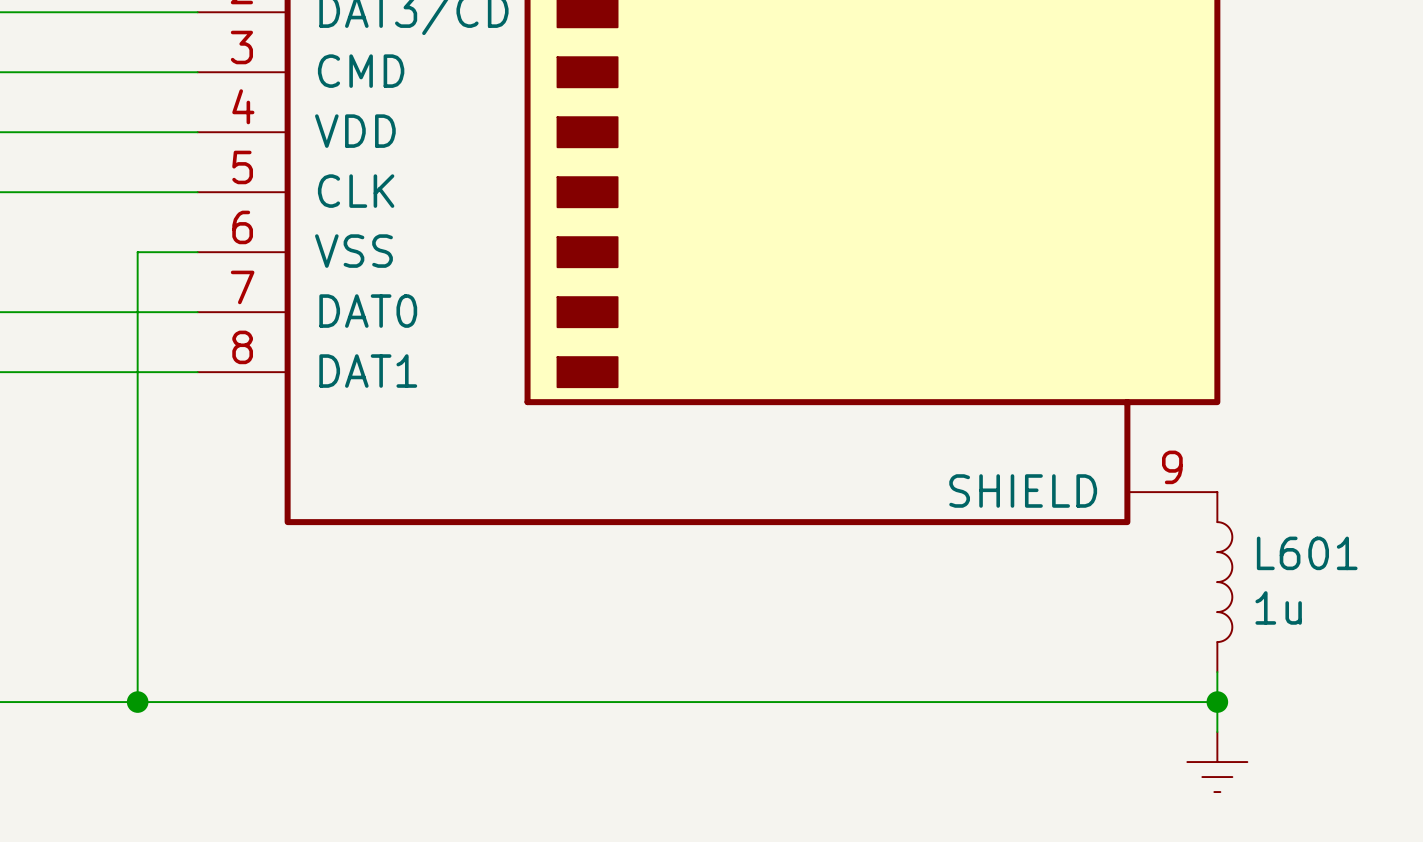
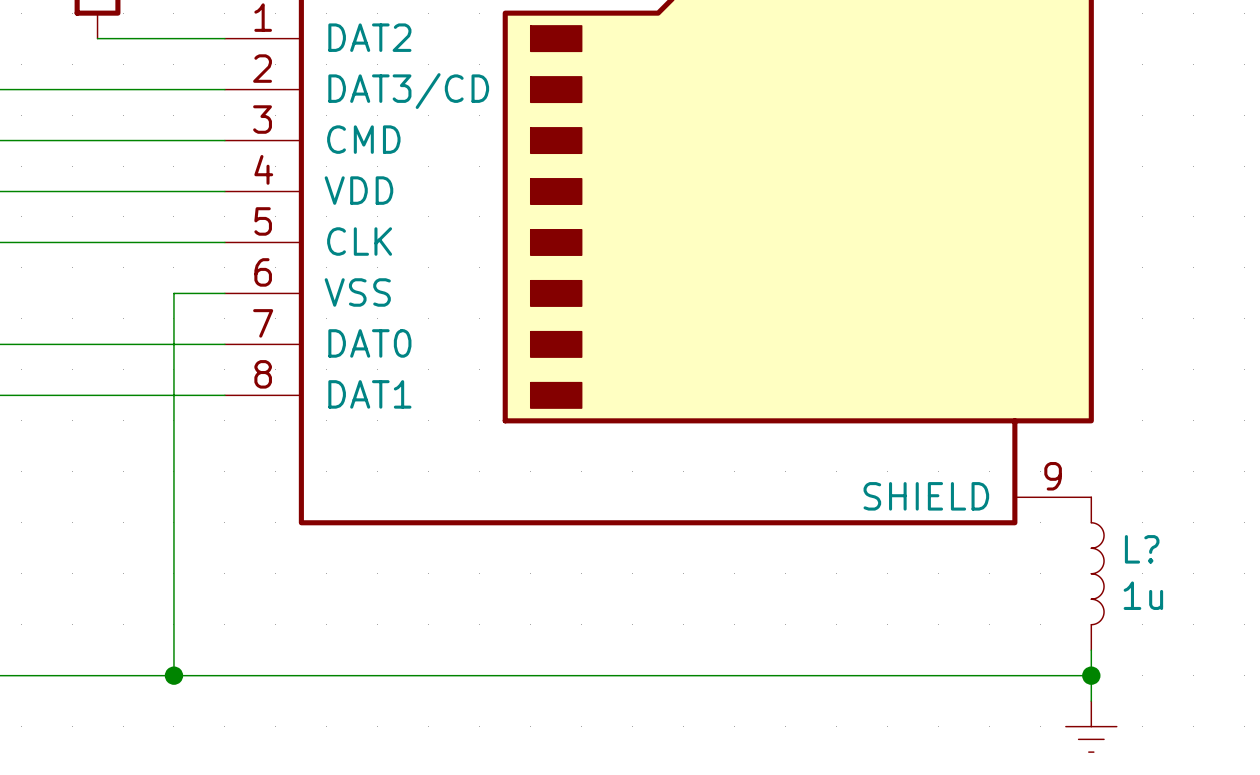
L601 name: L601 (1307, 553) -> L? (1142, 549)

